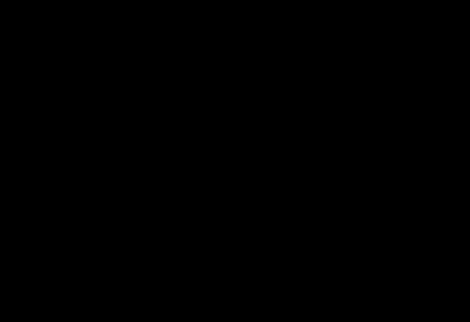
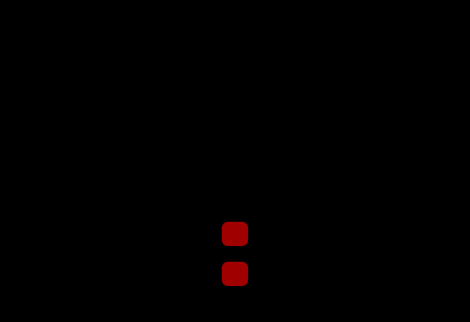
part: none -> (234, 253)

